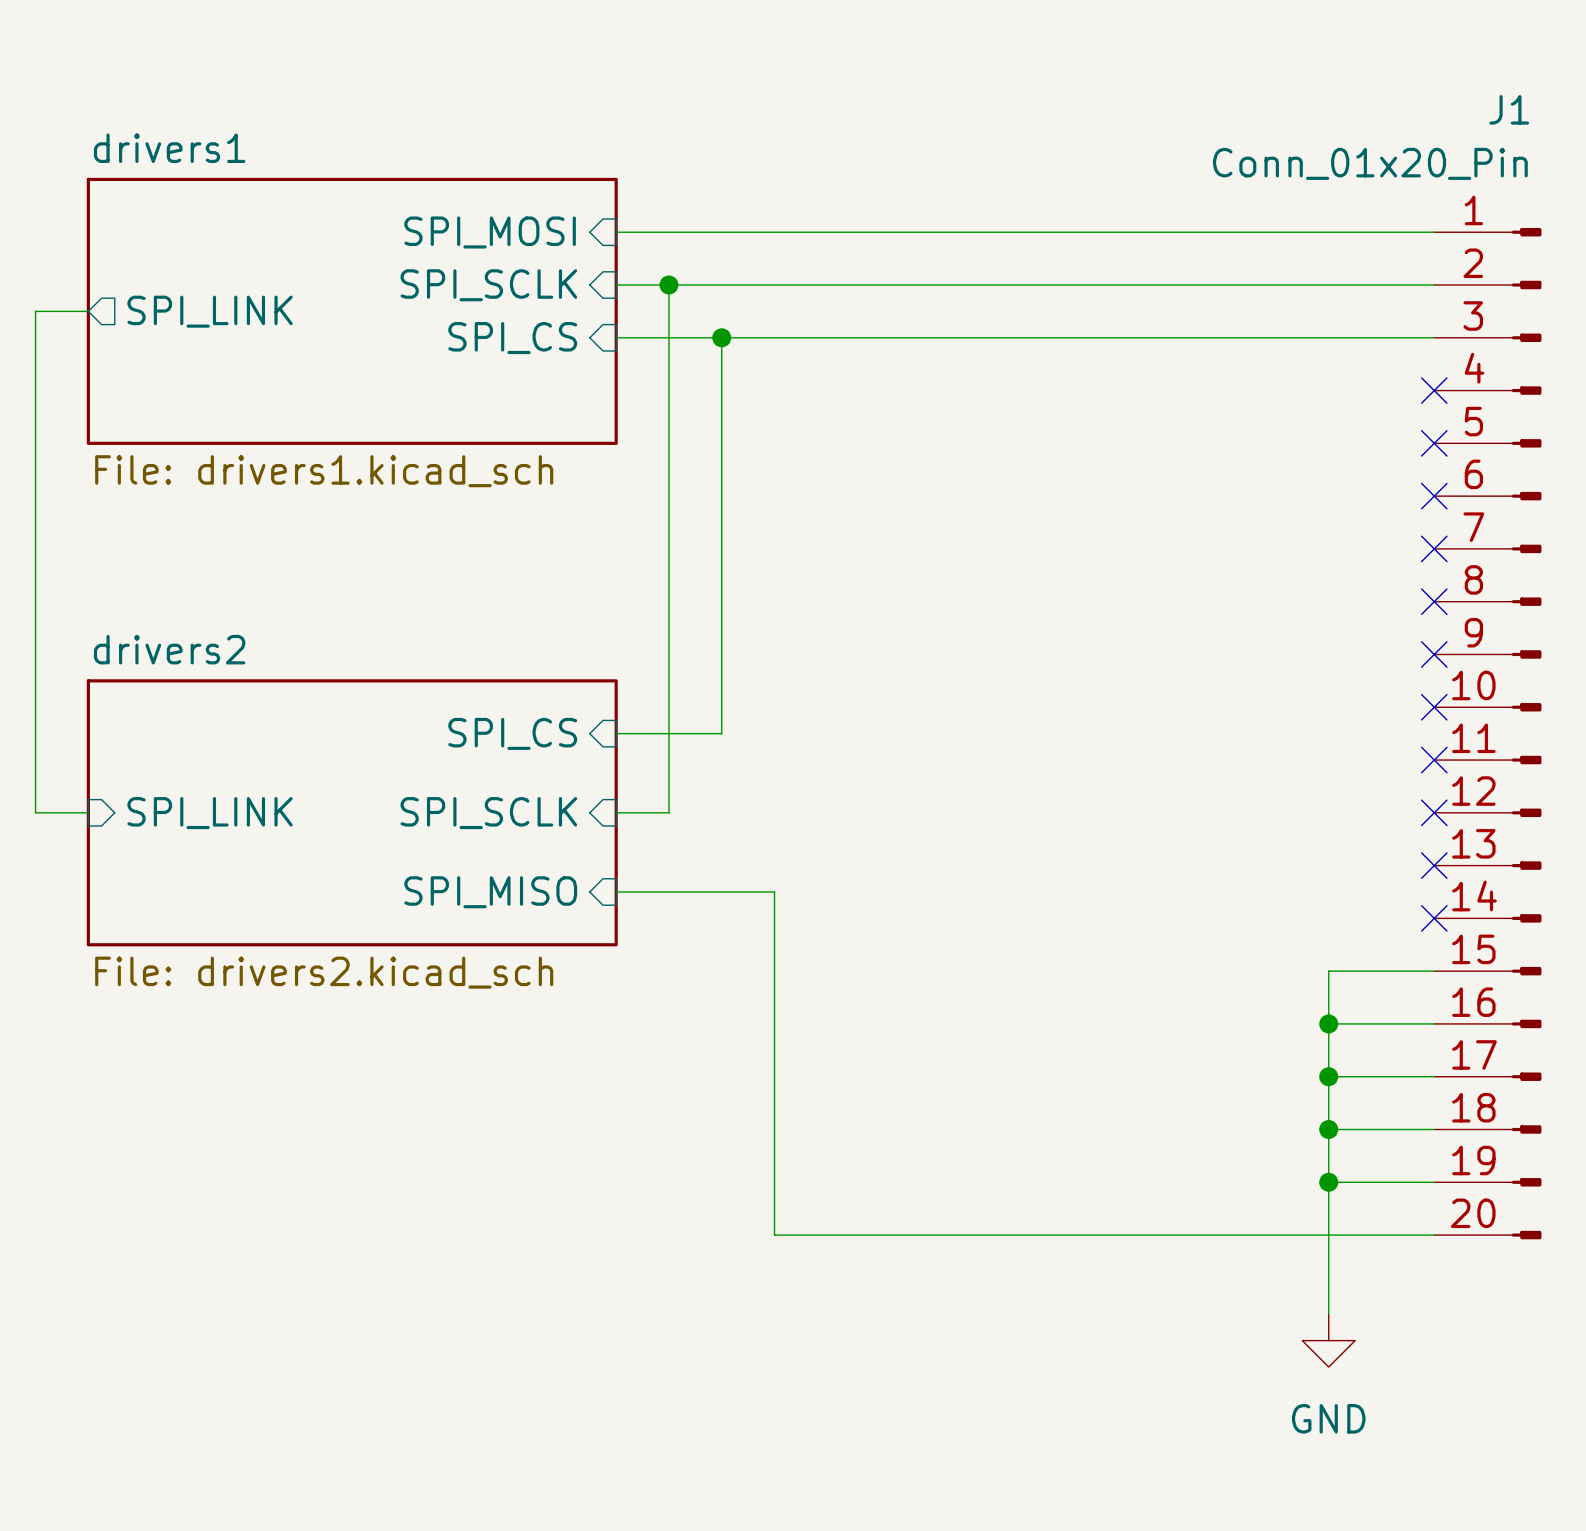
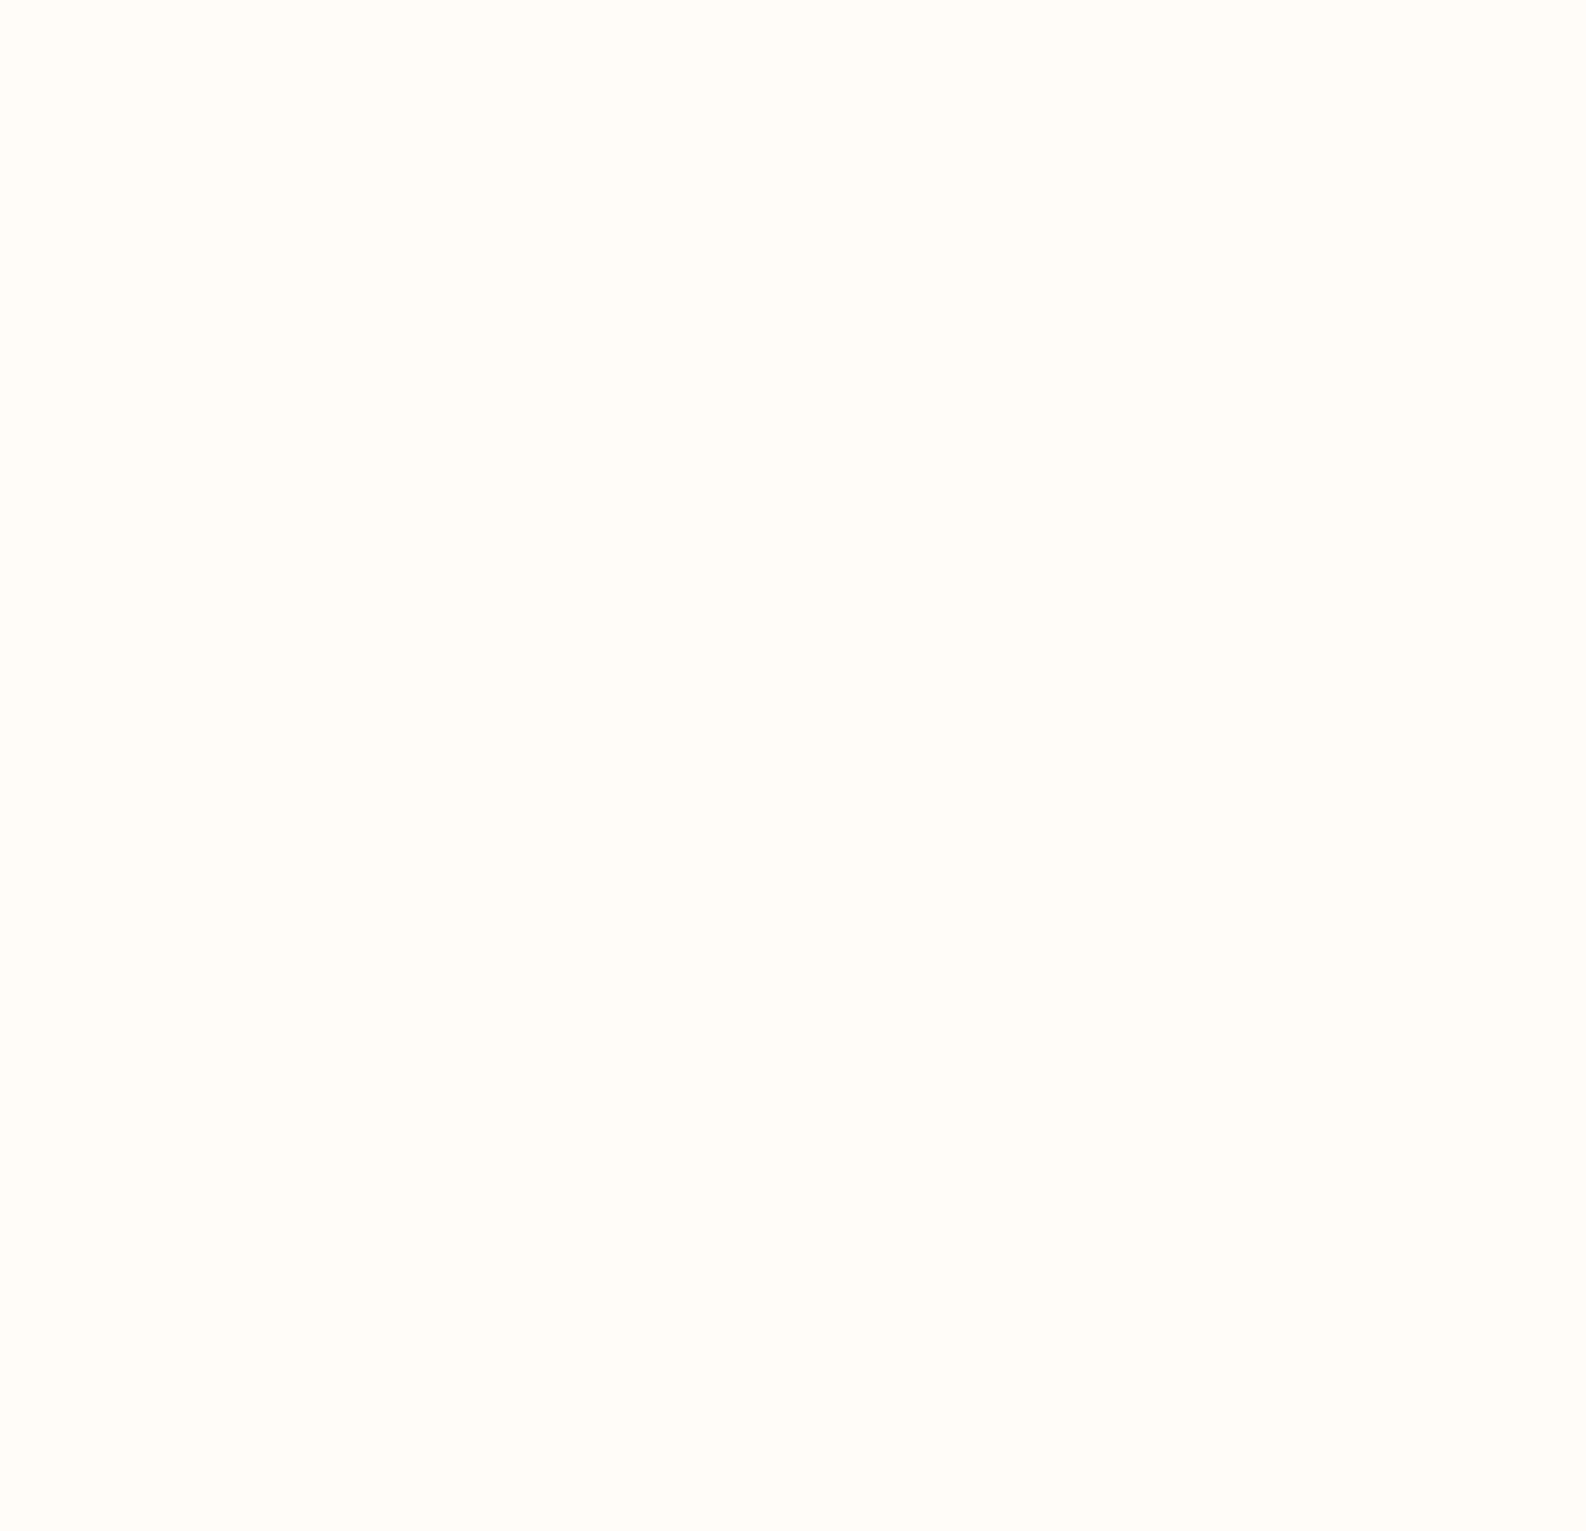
sheet pin: SPI_MOSI (490, 232) -> none
wire: (616, 232) (1434, 232) -> none
sheet pin: SPI_SCLK (488, 285) -> none
wire: (616, 285) (1434, 285) -> none
wire: (668, 285) (668, 812) (616, 812) -> none
junction: (668, 285) -> none
wire: (88, 311) (35, 311) (35, 812) (88, 812) -> none
sheet pin: SPI_LINK (210, 311) -> none
sheet drivers1: File: drivers1.kicad_sch (352, 311) -> none
wire: (616, 337) (1434, 337) -> none
wire: (721, 337) (721, 733) (616, 733) -> none
junction: (721, 337) -> none
sheet pin: SPI_CS (512, 338) -> none
no-connect mark: (1434, 390) -> none
no-connect mark: (1434, 443) -> none
no-connect mark: (1434, 496) -> none
no-connect mark: (1434, 548) -> none
no-connect mark: (1434, 601) -> none
no-connect mark: (1434, 654) -> none
no-connect mark: (1434, 707) -> none
sheet pin: SPI_CS (512, 733) -> none
J1: Conn_01x20_Pin (1487, 733) -> none
no-connect mark: (1434, 760) -> none
sheet drivers2: File: drivers2.kicad_sch (352, 812) -> none
no-connect mark: (1434, 812) -> none
sheet pin: SPI_LINK (210, 813) -> none
sheet pin: SPI_SCLK (488, 813) -> none
no-connect mark: (1434, 865) -> none
wire: (616, 891) (774, 891) (774, 1235) (1434, 1235) -> none
sheet pin: SPI_MISO (490, 892) -> none
no-connect mark: (1434, 918) -> none
wire: (1434, 971) (1328, 971) (1328, 1314) -> none
wire: (1328, 1023) (1434, 1023) -> none
junction: (1328, 1023) -> none
wire: (1328, 1076) (1434, 1076) -> none
junction: (1328, 1076) -> none
wire: (1328, 1129) (1434, 1129) -> none
junction: (1328, 1129) -> none
wire: (1328, 1182) (1434, 1182) -> none
junction: (1328, 1182) -> none
power symbol: GND (1328, 1340) -> none

